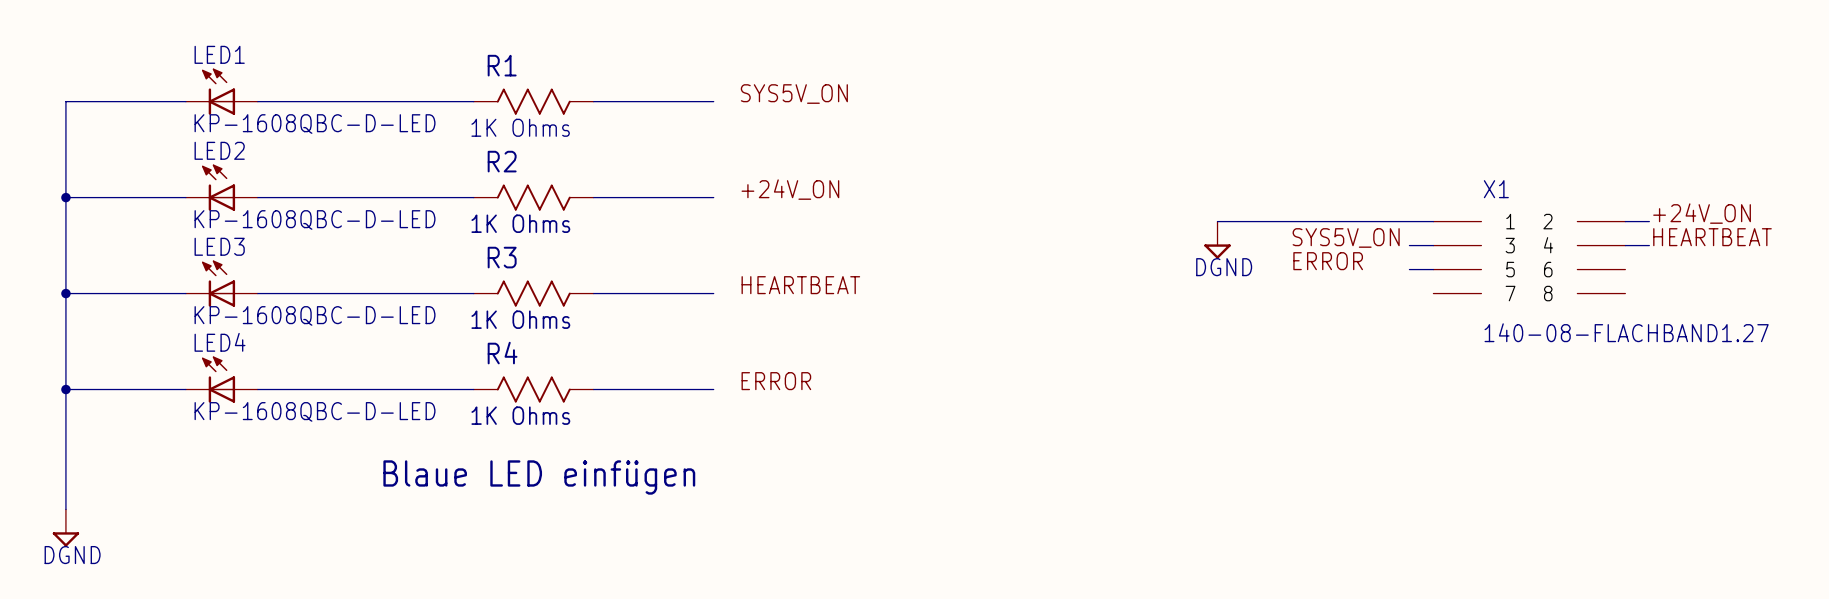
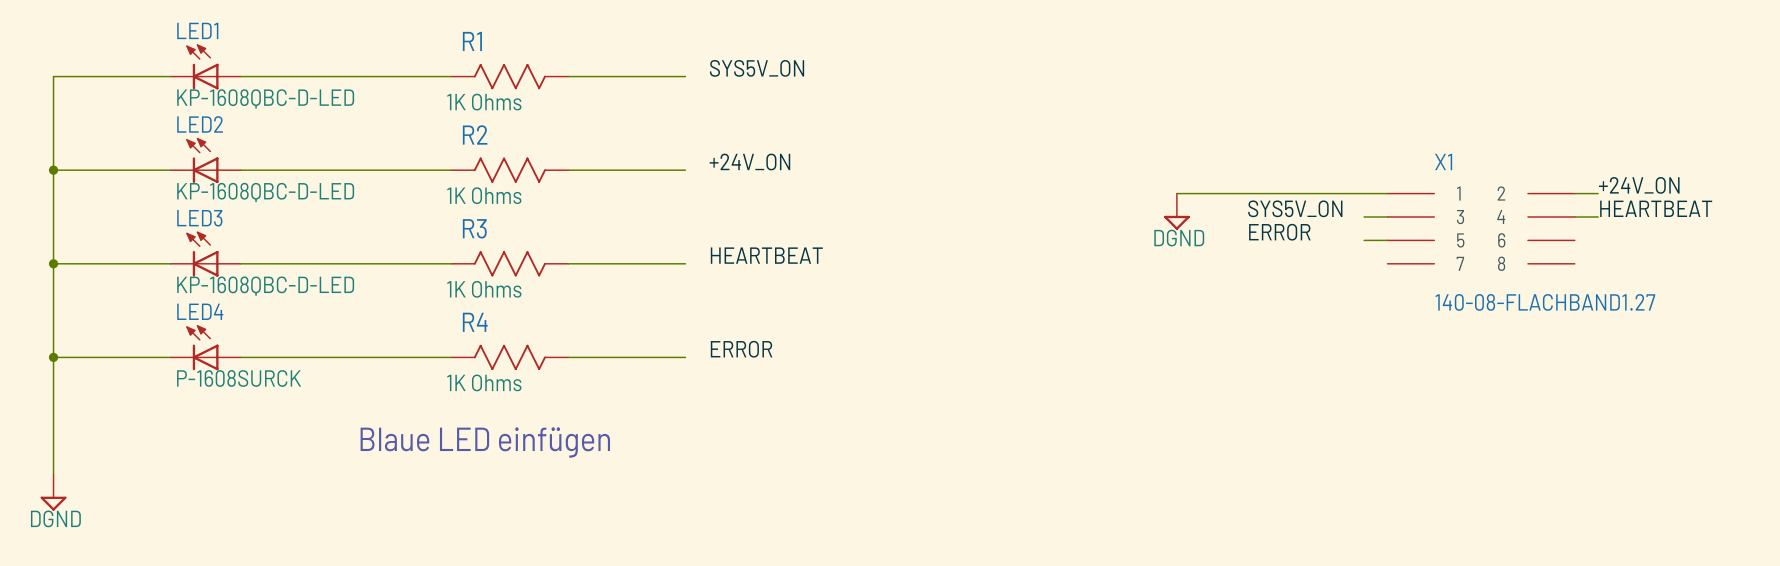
LED4 value: KP-1608QBC-D-LED (315, 411) -> P-1608SURCK (239, 378)

